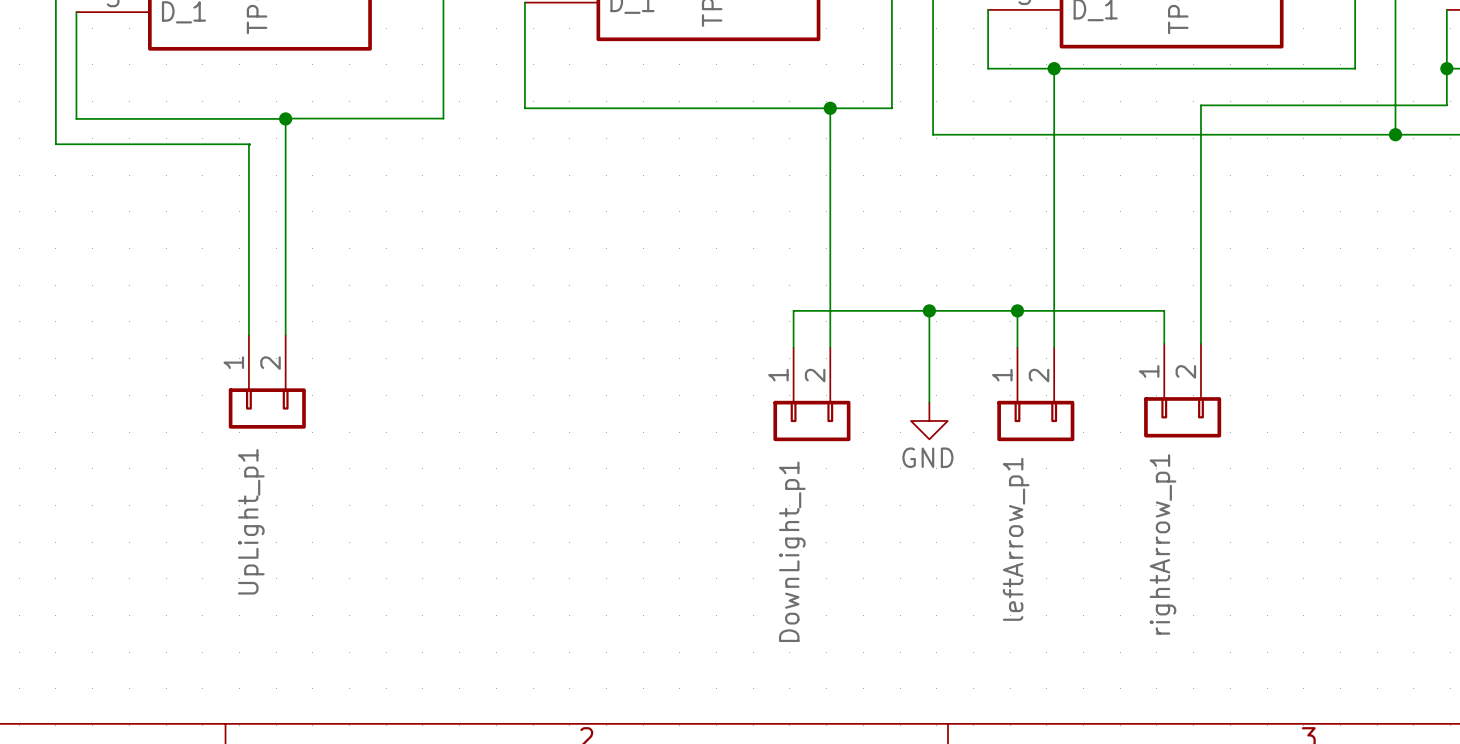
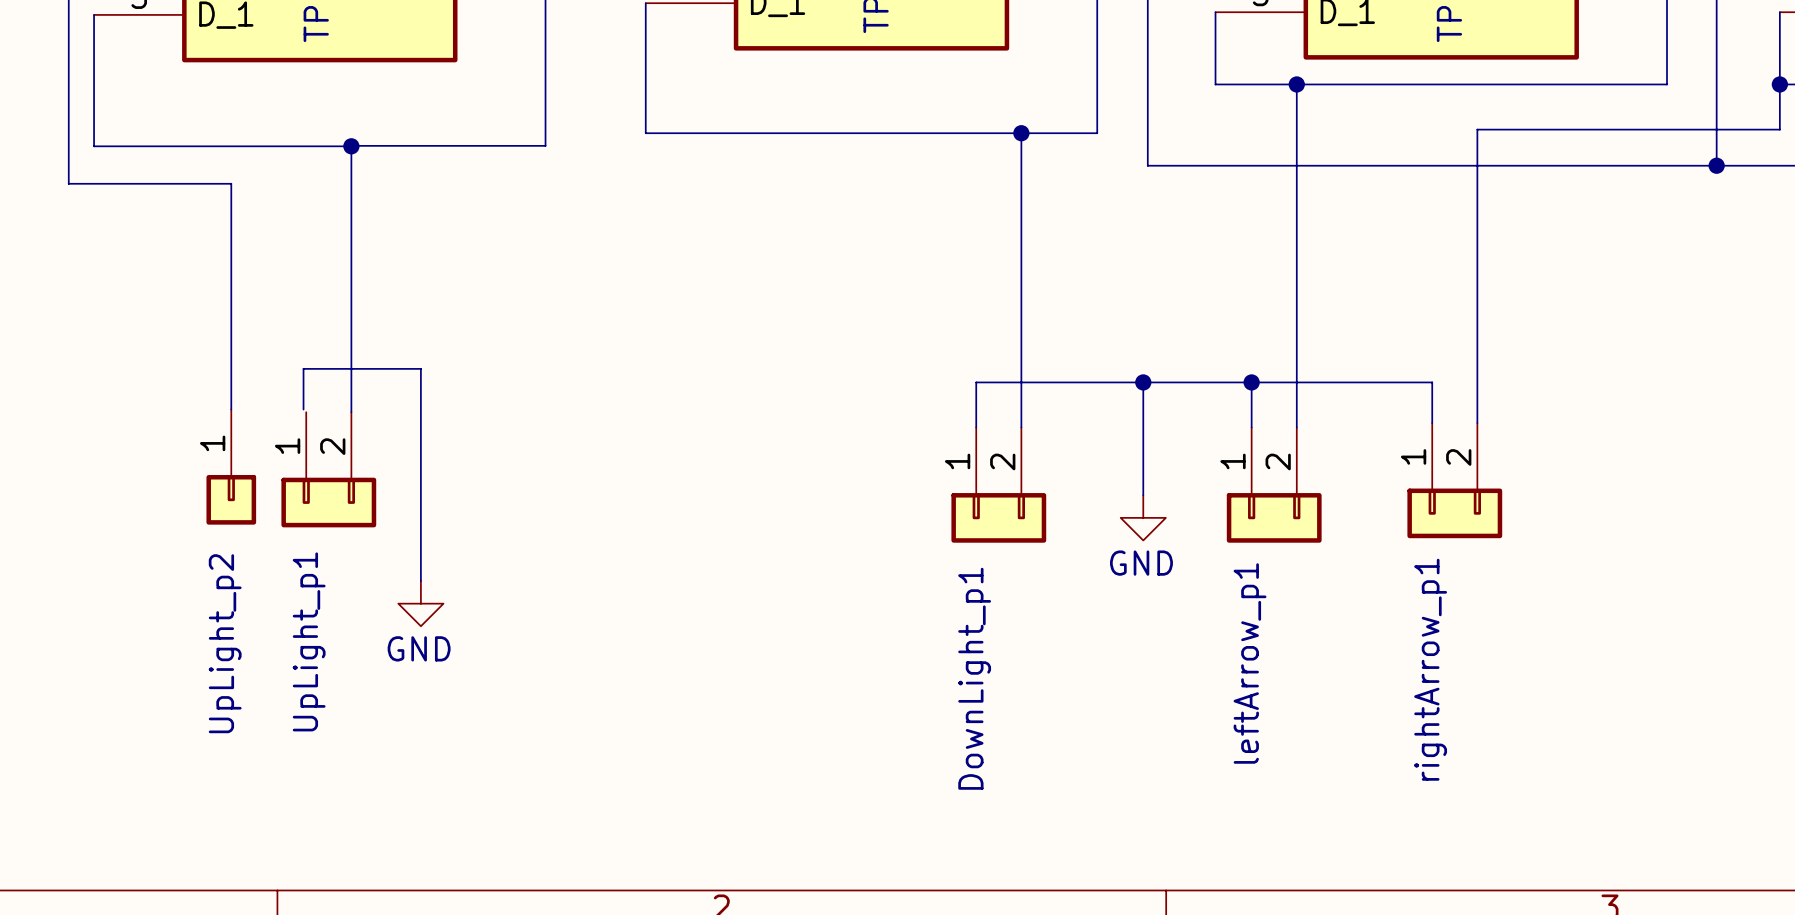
wire: (55, 144) (249, 144) (248, 335) -> (68, 177) (68, 183) (231, 183) (231, 409)
wire: none -> (303, 409) (303, 368) (420, 368) (420, 581)
UpLight_p2: none -> (231, 467)
power symbol: none -> GND (420, 603)

